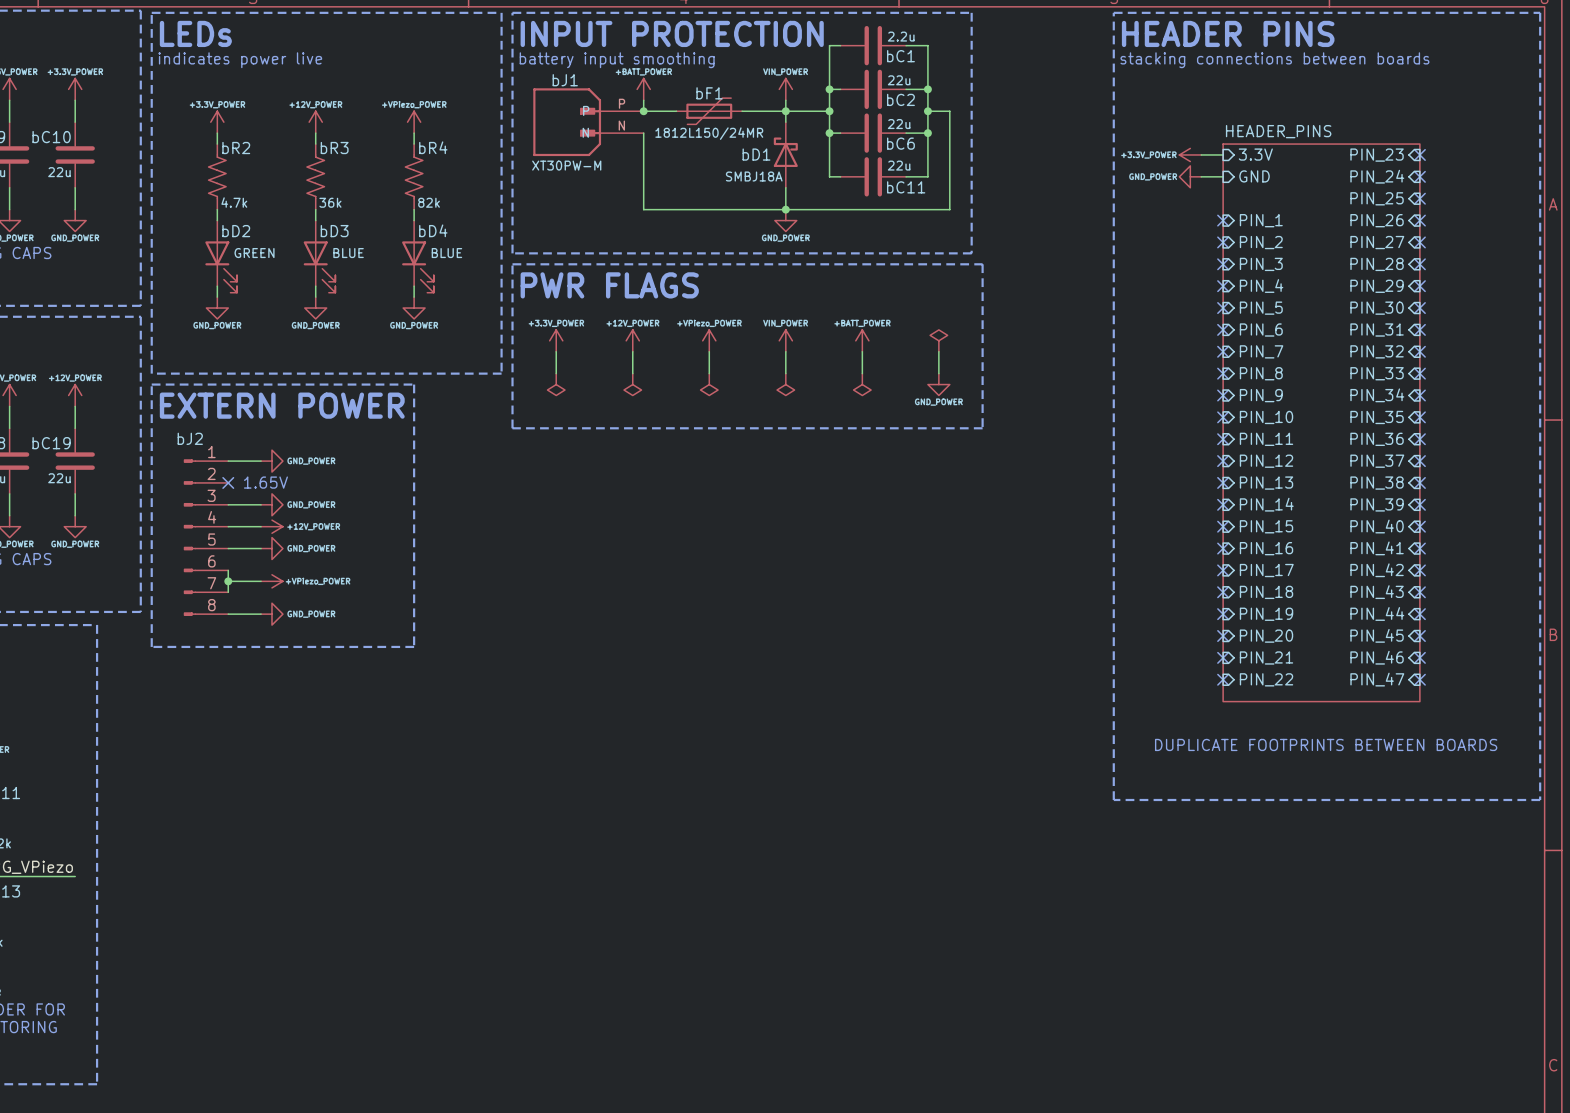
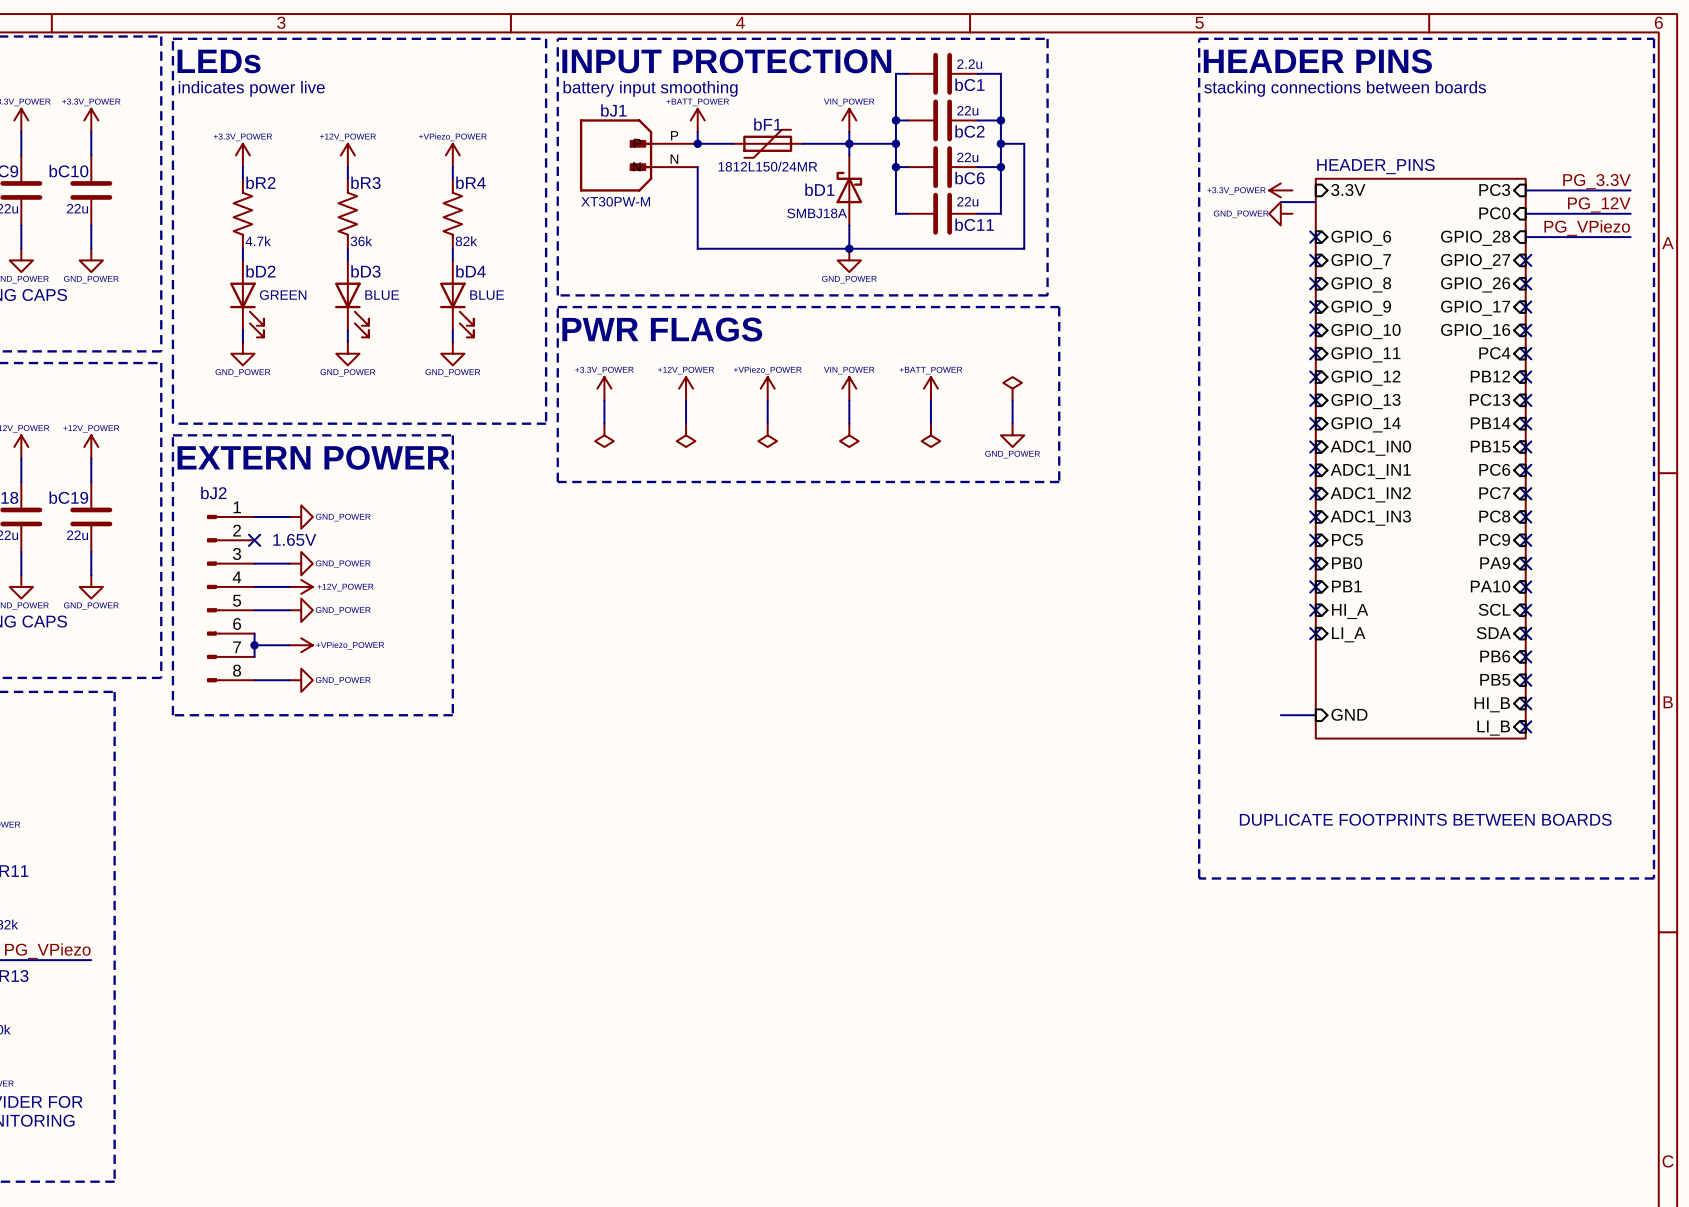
label: none -> PG_3.3V (1596, 181)
wire: (1201, 154) (1223, 154) -> none
wire: none -> (1525, 190) (1630, 190)
no-connect mark: (1419, 154) -> none
sheet pin: PIN_23 (1377, 155) -> PC3 (1494, 190)
wire: none -> (1280, 202) (1315, 202)
label: none -> PG_12V (1599, 204)
wire: (1201, 176) (1223, 176) -> none
sheet pin: GND (1254, 176) -> none
sheet pin: PIN_24 (1377, 176) -> PC0 (1494, 213)
wire: none -> (1525, 213) (1630, 213)
no-connect mark: (1419, 176) -> none
label: none -> PG_VPiezo (1587, 228)
no-connect mark: none -> (1315, 237)
sheet pin: none -> GPIO_6 (1361, 238)
sheet pin: PIN_25 (1377, 198) -> GPIO_28 (1475, 238)
wire: none -> (1525, 237) (1630, 237)
no-connect mark: (1419, 198) -> none
sheet pin: PIN_1 (1261, 220) -> GPIO_7 (1361, 261)
sheet pin: PIN_26 (1377, 220) -> GPIO_27 (1475, 261)
sheet pin: PIN_2 (1261, 242) -> GPIO_8 (1361, 284)
sheet pin: PIN_27 (1377, 242) -> GPIO_26 (1475, 284)
sheet pin: PIN_3 (1261, 264) -> GPIO_9 (1361, 308)
sheet pin: PIN_28 (1377, 264) -> GPIO_17 (1475, 308)
sheet pin: PIN_4 (1261, 286) -> GPIO_10 (1366, 331)
sheet pin: PIN_29 (1377, 286) -> GPIO_16 (1475, 331)
sheet pin: PIN_5 (1261, 308) -> GPIO_11 (1365, 354)
sheet pin: PIN_30 (1377, 308) -> PC4 (1494, 353)
sheet pin: PIN_6 (1261, 330) -> GPIO_12 (1365, 378)
sheet pin: PIN_31 (1377, 330) -> PB12 (1490, 376)
sheet pin: PIN_7 (1261, 351) -> GPIO_13 (1365, 401)
sheet pin: PIN_32 (1377, 351) -> PC13 (1490, 399)
sheet pin: PIN_8 (1261, 373) -> GPIO_14 (1366, 424)
sheet pin: PIN_33 (1377, 373) -> PB14 (1490, 423)
sheet pin: PIN_9 (1261, 395) -> ADC1_IN0 (1370, 448)
sheet pin: PIN_34 (1377, 395) -> PB15 (1490, 446)
sheet HEADER_PINS: none -> (1420, 458)
sheet pin: PIN_10 (1266, 417) -> ADC1_IN1 (1370, 471)
sheet pin: PIN_35 (1377, 417) -> PC6 (1494, 469)
sheet HEADER_PINS: (1321, 422) -> none
sheet pin: PIN_11 (1266, 439) -> ADC1_IN2 (1370, 494)
sheet pin: PIN_36 (1377, 439) -> PC7 (1494, 493)
sheet pin: PIN_12 (1266, 461) -> ADC1_IN3 (1370, 518)
sheet pin: PIN_37 (1377, 461) -> PC8 (1494, 516)
sheet pin: PIN_13 (1266, 483) -> PC5 (1347, 539)
sheet pin: PIN_38 (1377, 483) -> PC9 (1494, 539)
sheet pin: PIN_14 (1266, 504) -> PB0 (1346, 563)
sheet pin: PIN_39 (1377, 504) -> PA9 (1495, 563)
sheet pin: PIN_15 (1266, 526) -> PB1 (1346, 586)
sheet pin: PIN_40 (1377, 526) -> PA10 (1490, 586)
sheet pin: PIN_16 (1266, 548) -> HI_A (1350, 611)
sheet pin: PIN_41 (1377, 548) -> SCL (1494, 609)
sheet pin: PIN_17 (1266, 570) -> LI_A (1348, 634)
sheet pin: PIN_42 (1377, 570) -> SDA (1493, 633)
no-connect mark: (1223, 592) -> none
sheet pin: PIN_18 (1266, 592) -> none
sheet pin: PIN_43 (1377, 592) -> PB6 (1495, 656)
sheet pin: PIN_44 (1377, 613) -> PB5 (1495, 679)
no-connect mark: (1223, 614) -> none
sheet pin: PIN_19 (1266, 614) -> none
sheet pin: PIN_45 (1377, 635) -> HI_B (1492, 704)
no-connect mark: (1223, 636) -> none
sheet pin: PIN_20 (1266, 636) -> none
wire: none -> (1280, 715) (1315, 715)
sheet pin: none -> GND (1349, 714)
no-connect mark: (1223, 657) -> none
sheet pin: PIN_21 (1266, 657) -> none
sheet pin: PIN_46 (1377, 657) -> LI_B (1493, 728)
no-connect mark: (1223, 679) -> none
sheet pin: PIN_22 (1266, 679) -> none
sheet pin: PIN_47 (1377, 679) -> none
no-connect mark: (1419, 679) -> none

